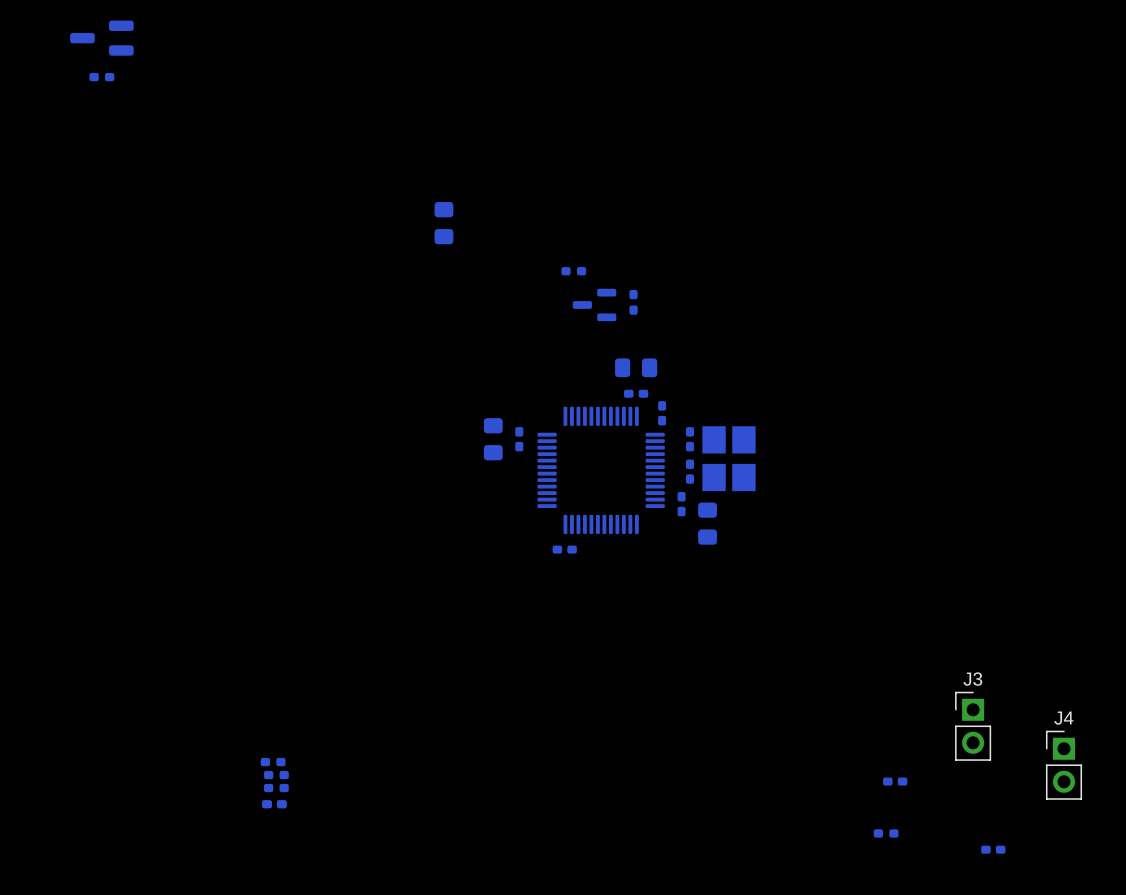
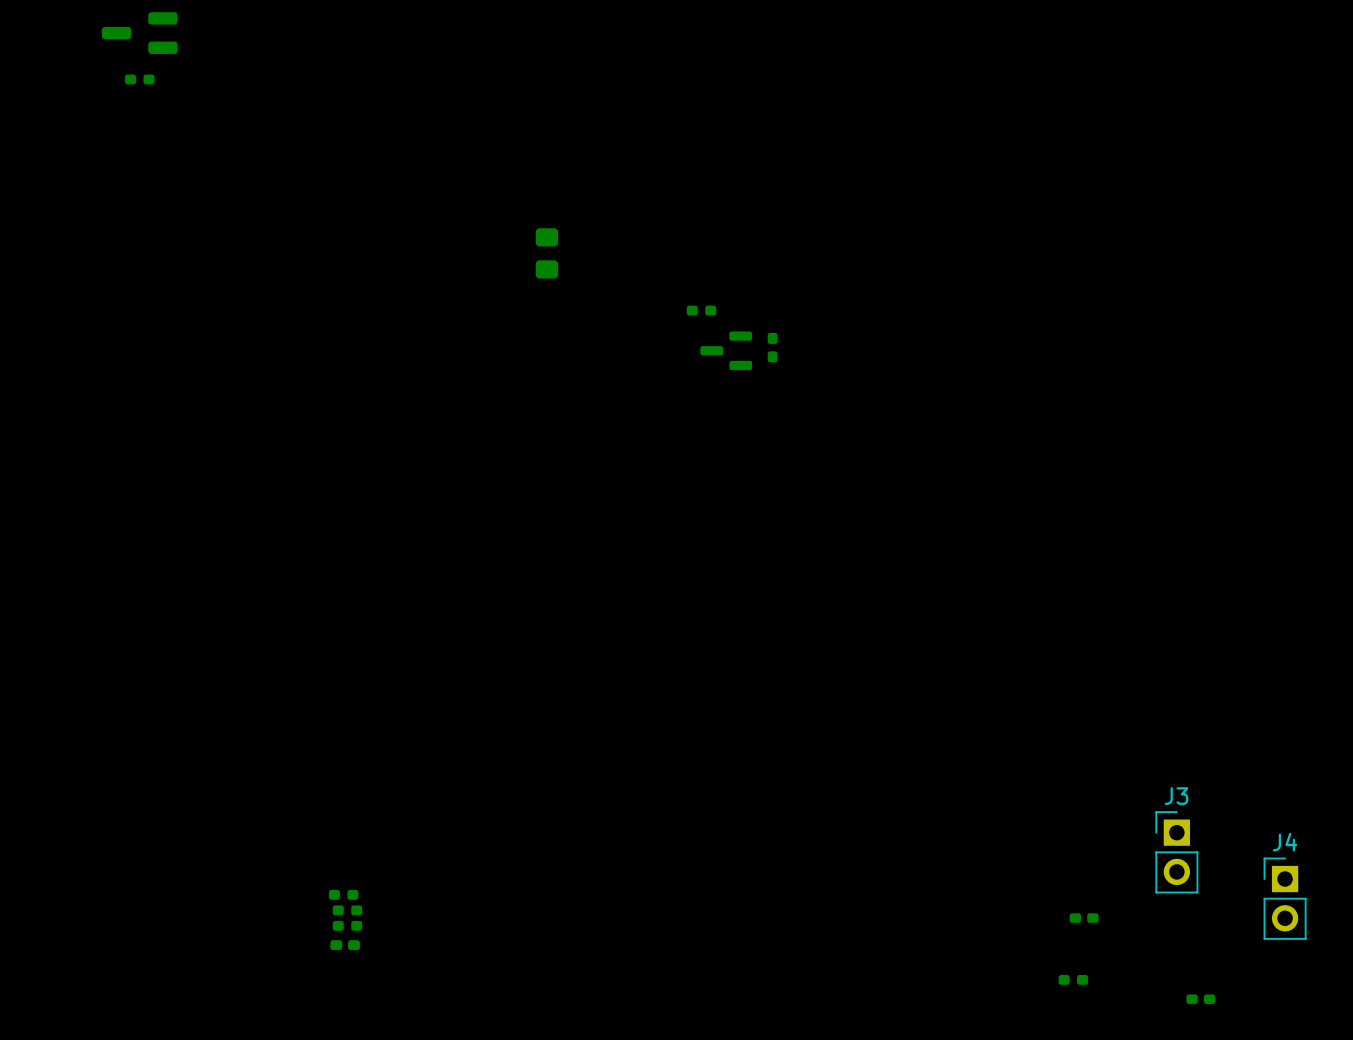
part: (636, 367) -> none
part: (636, 393) -> none
part: (662, 413) -> none
part: (493, 439) -> none
part: (519, 439) -> none
part: (690, 439) -> none
part: (728, 458) -> none
part: (601, 470) -> none
part: (690, 471) -> none
part: (681, 504) -> none
part: (707, 523) -> none
part: (564, 549) -> none

